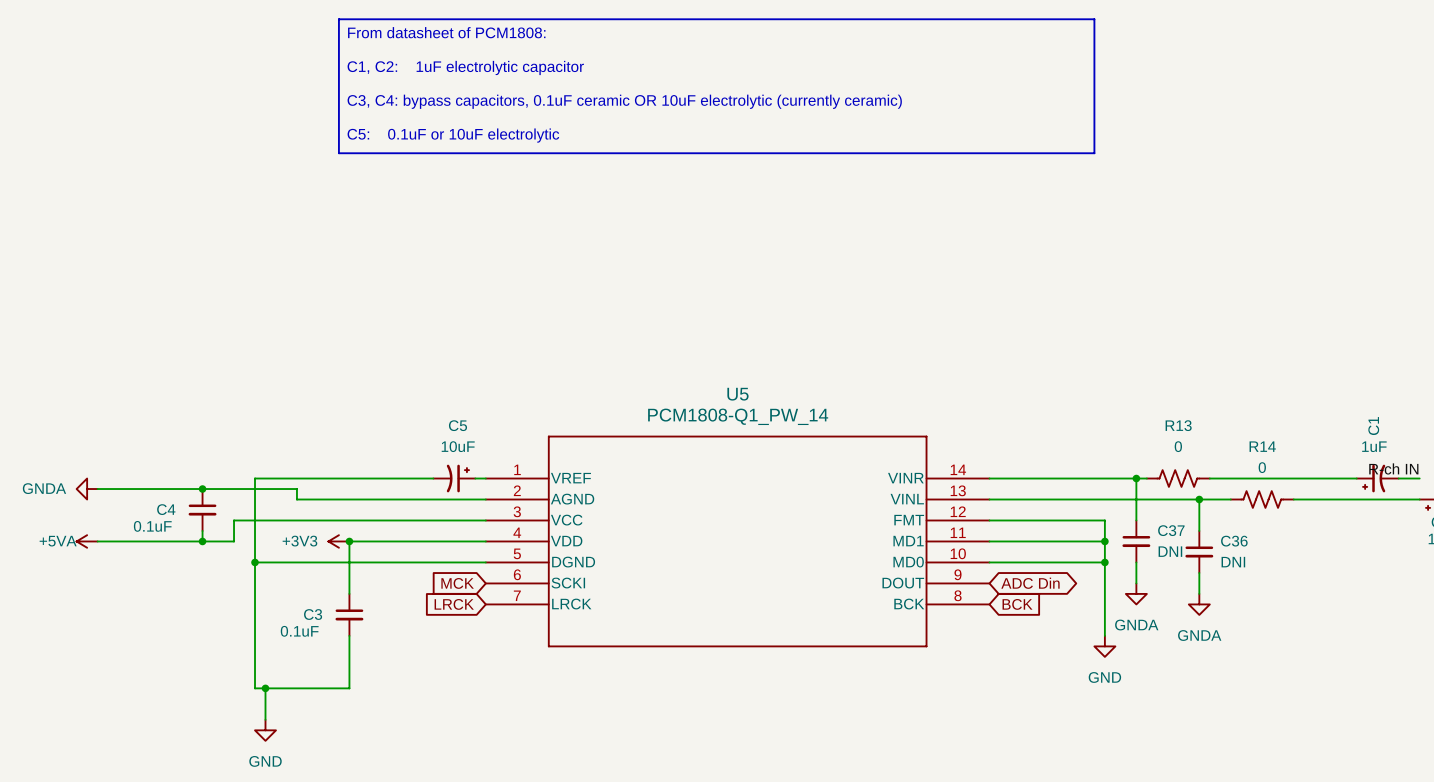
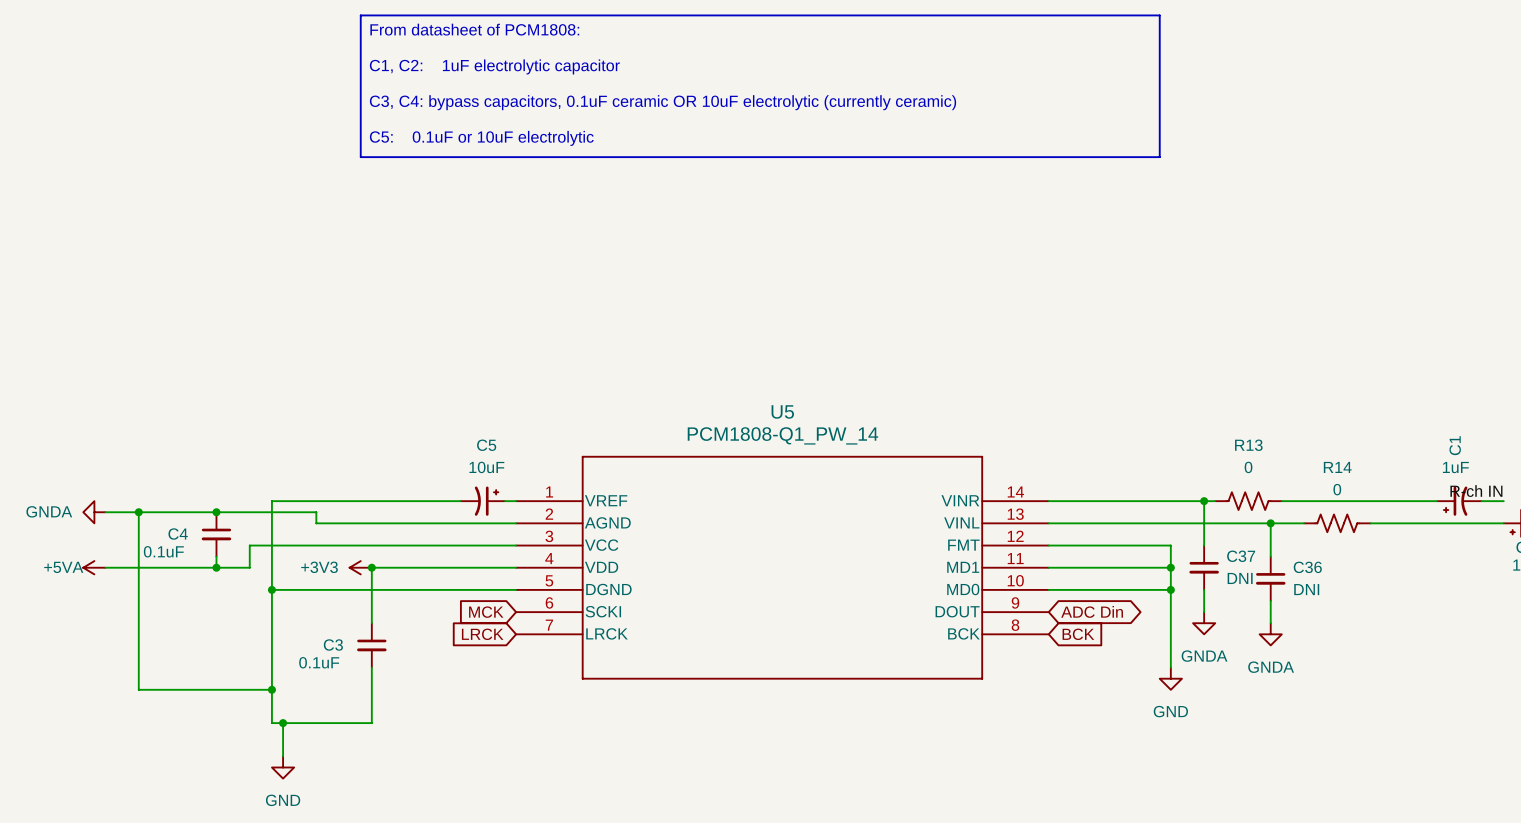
wire: none -> (138, 512) (138, 689) (271, 689)
junction: none -> (138, 512)
junction: none -> (271, 689)

